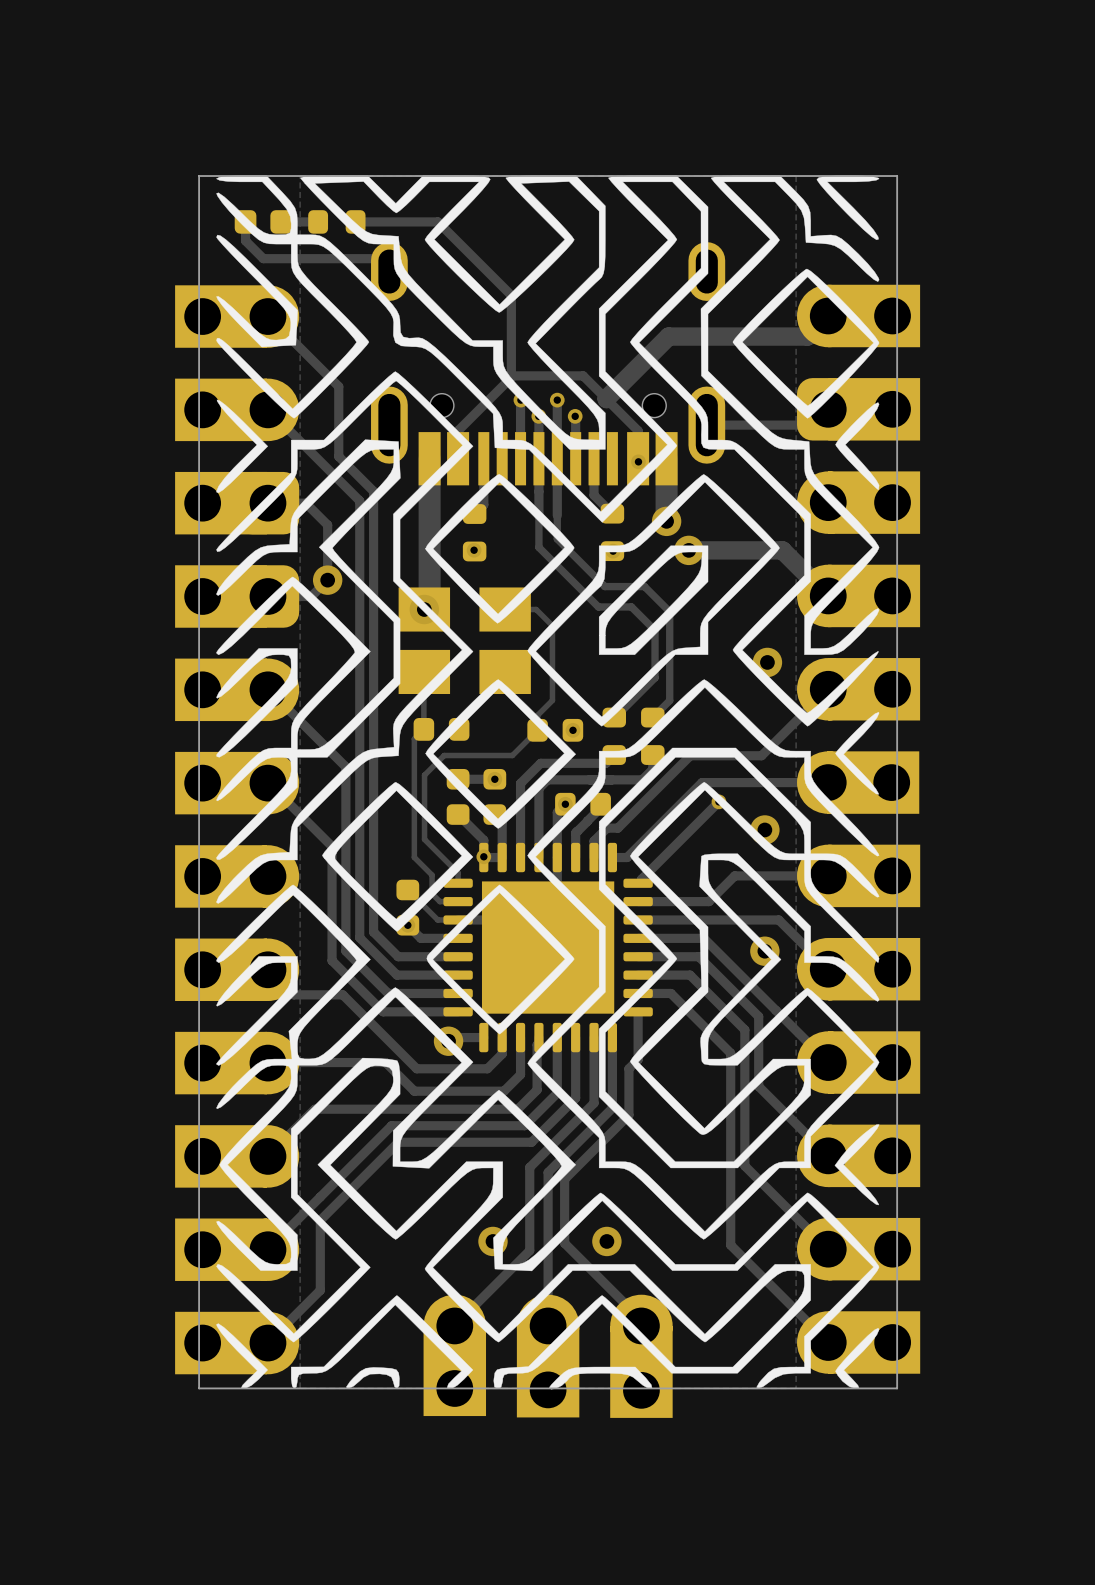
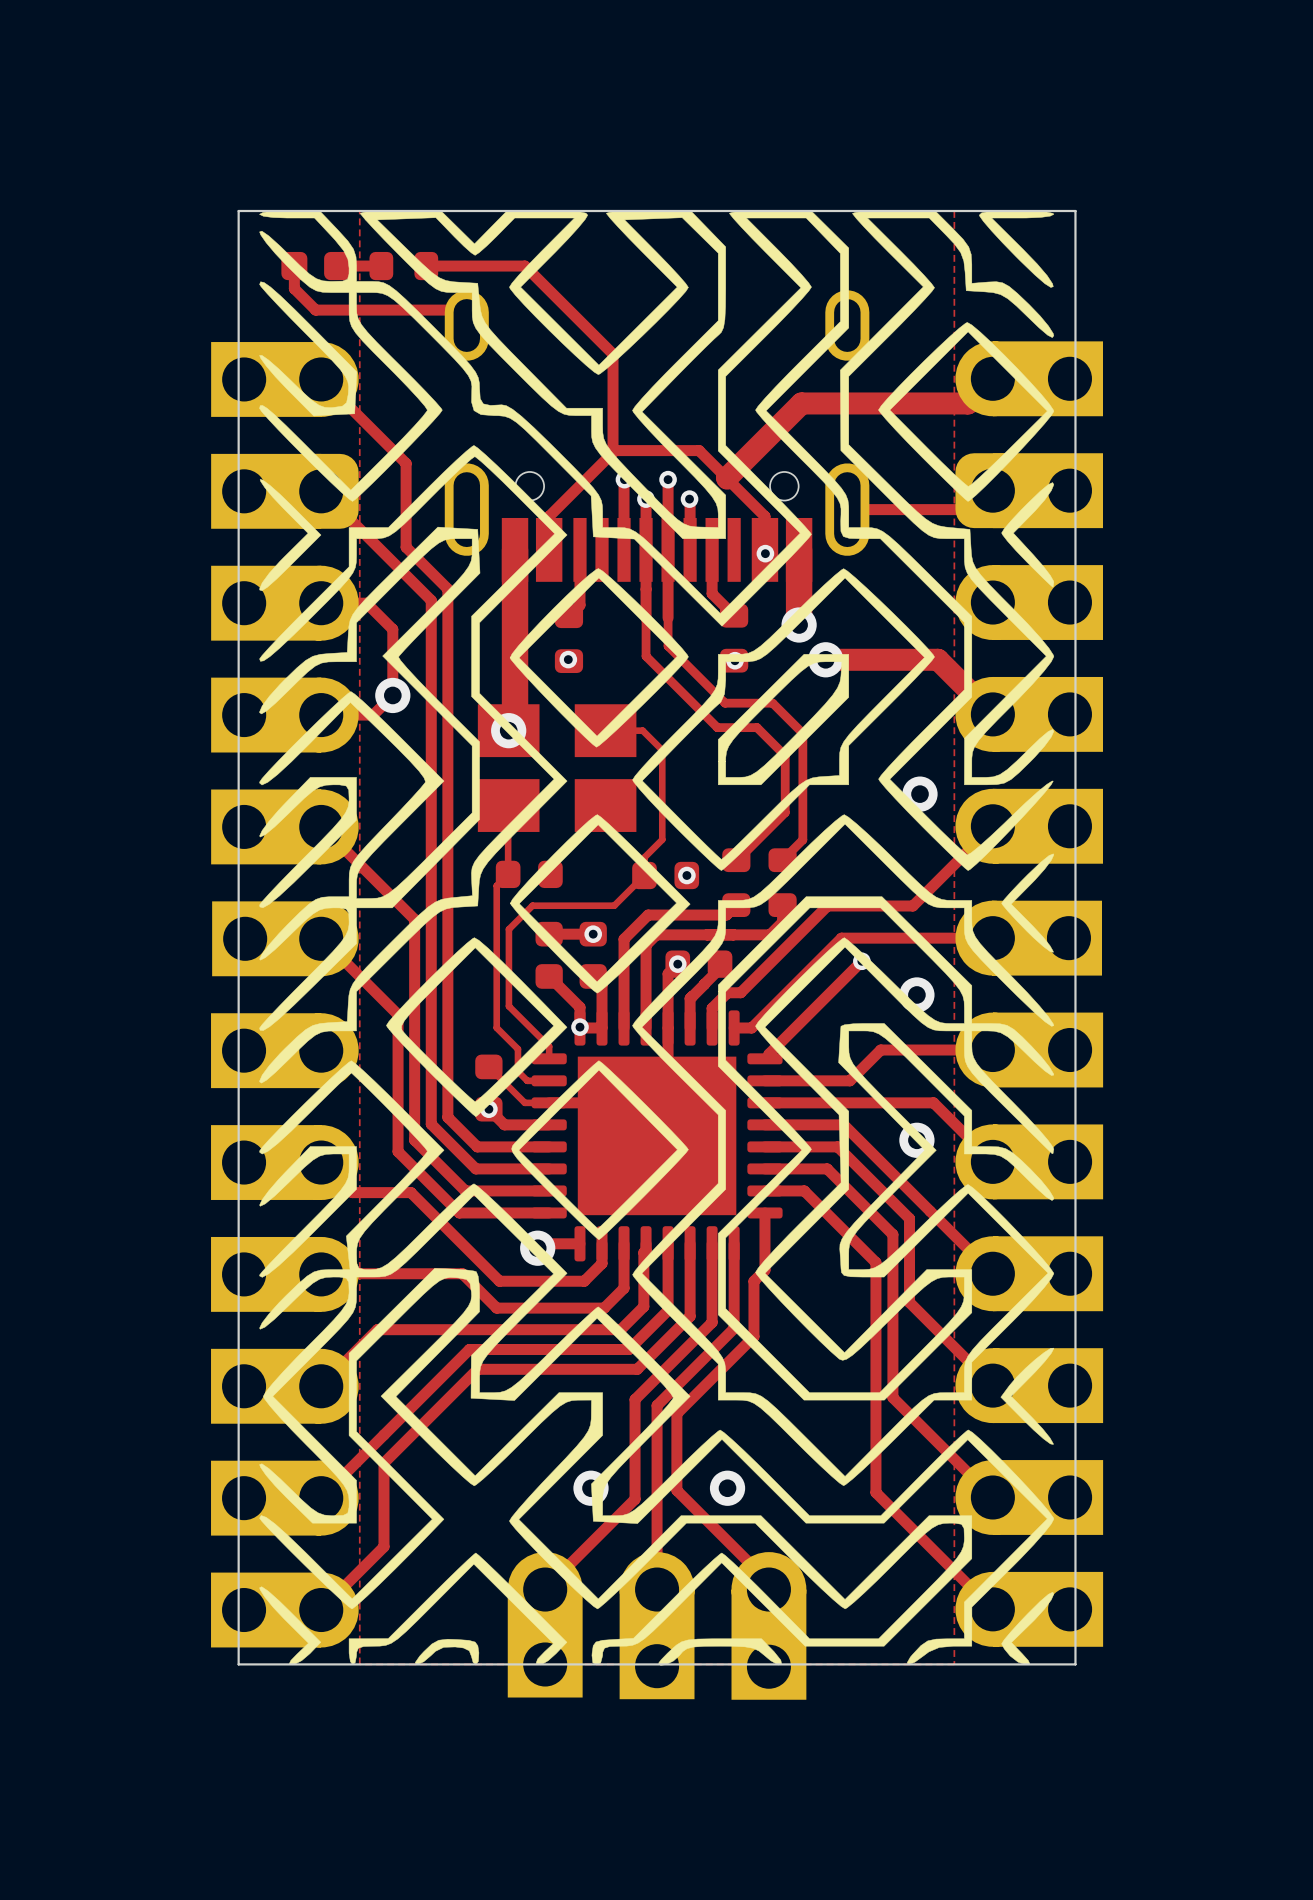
part footprint: [175, 285, 300, 1375] -> [211, 342, 359, 1648]

